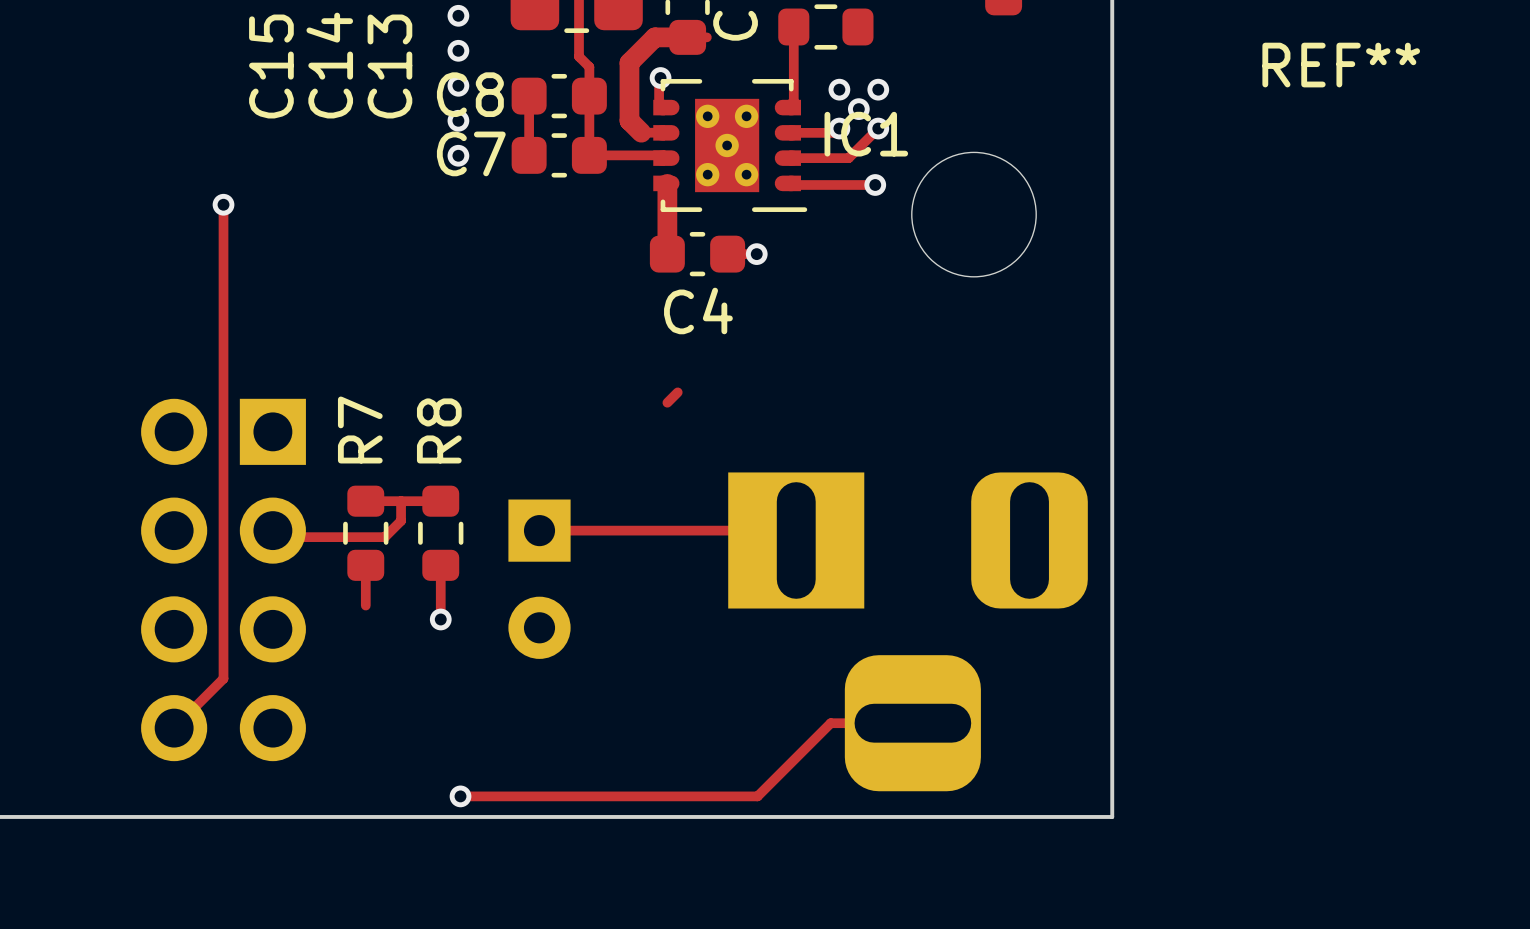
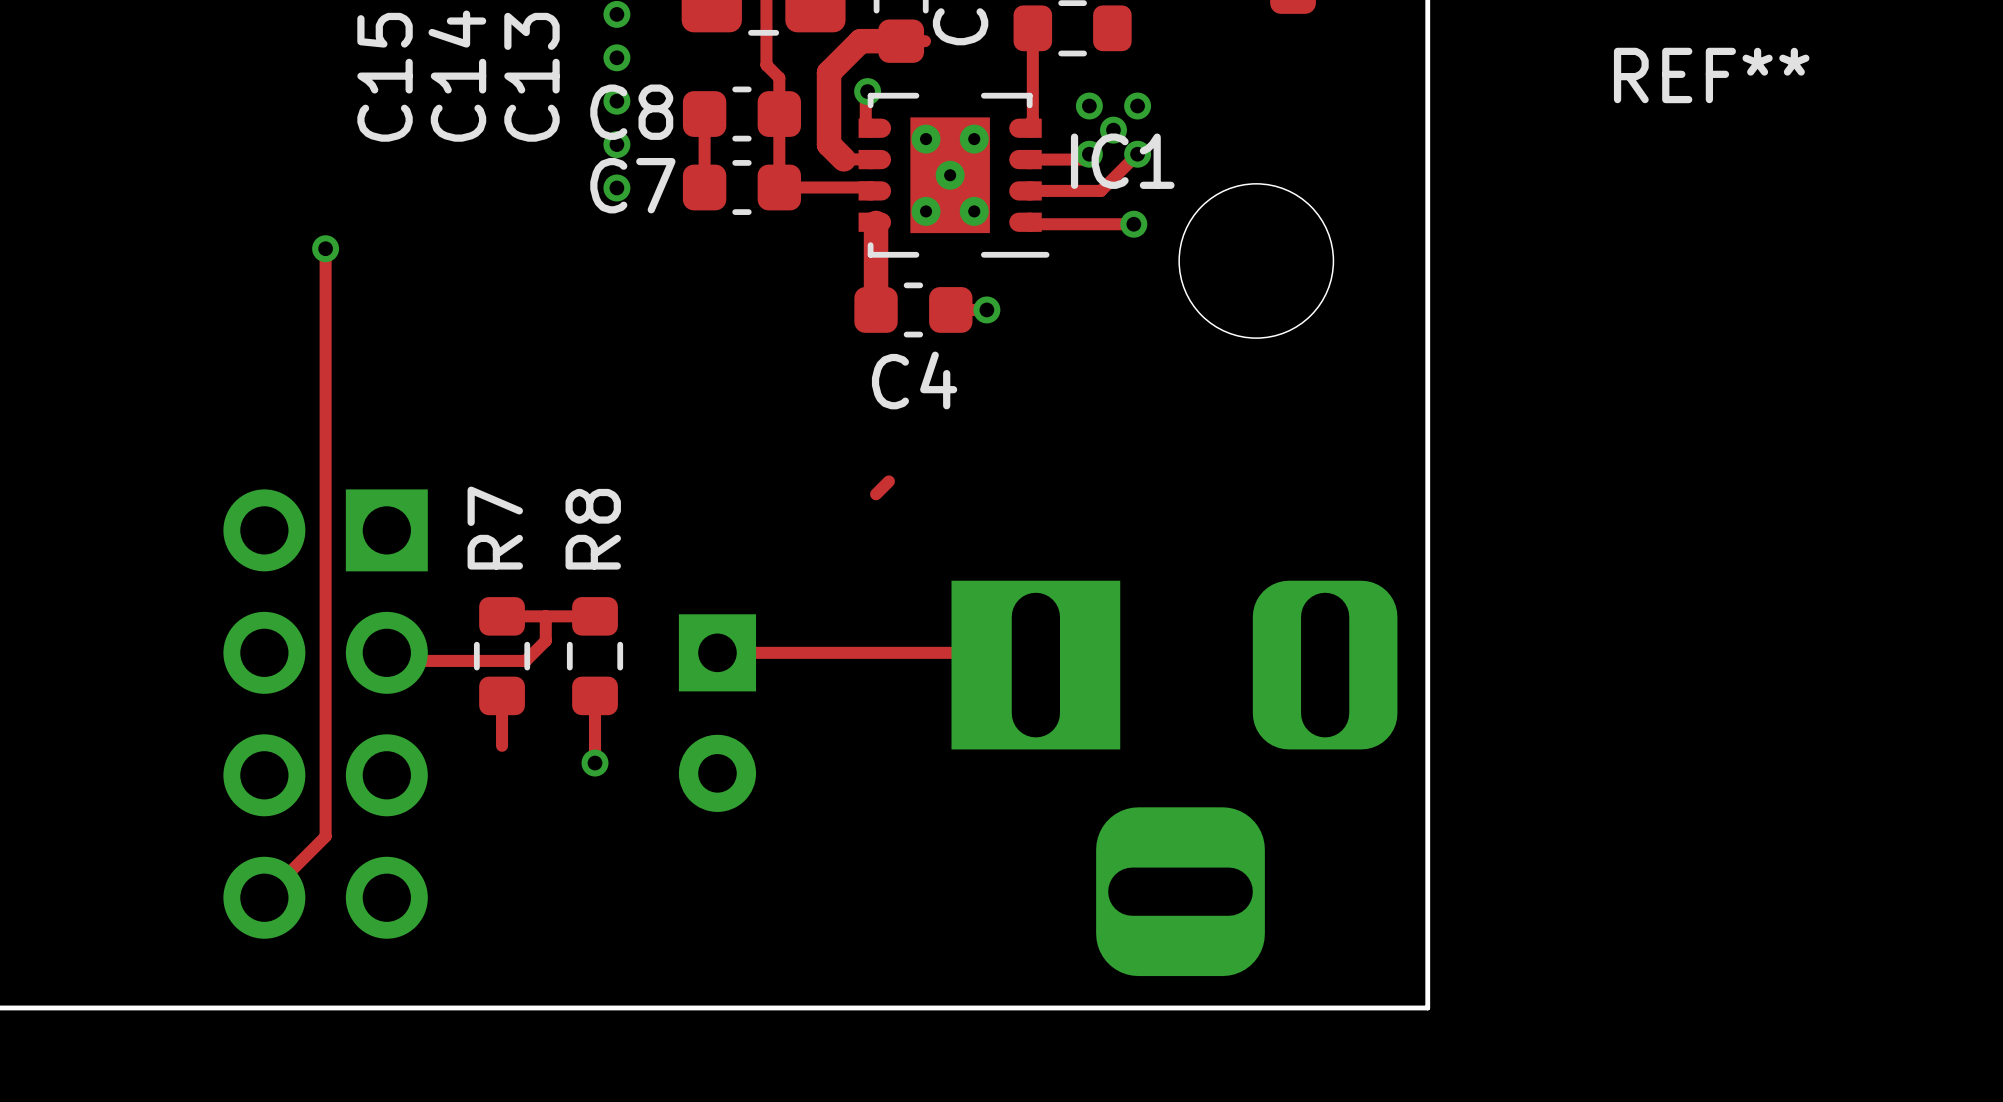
track: (912, 723) (830, 723) (757, 796) (460, 796) -> none
via: (460, 796) -> none

